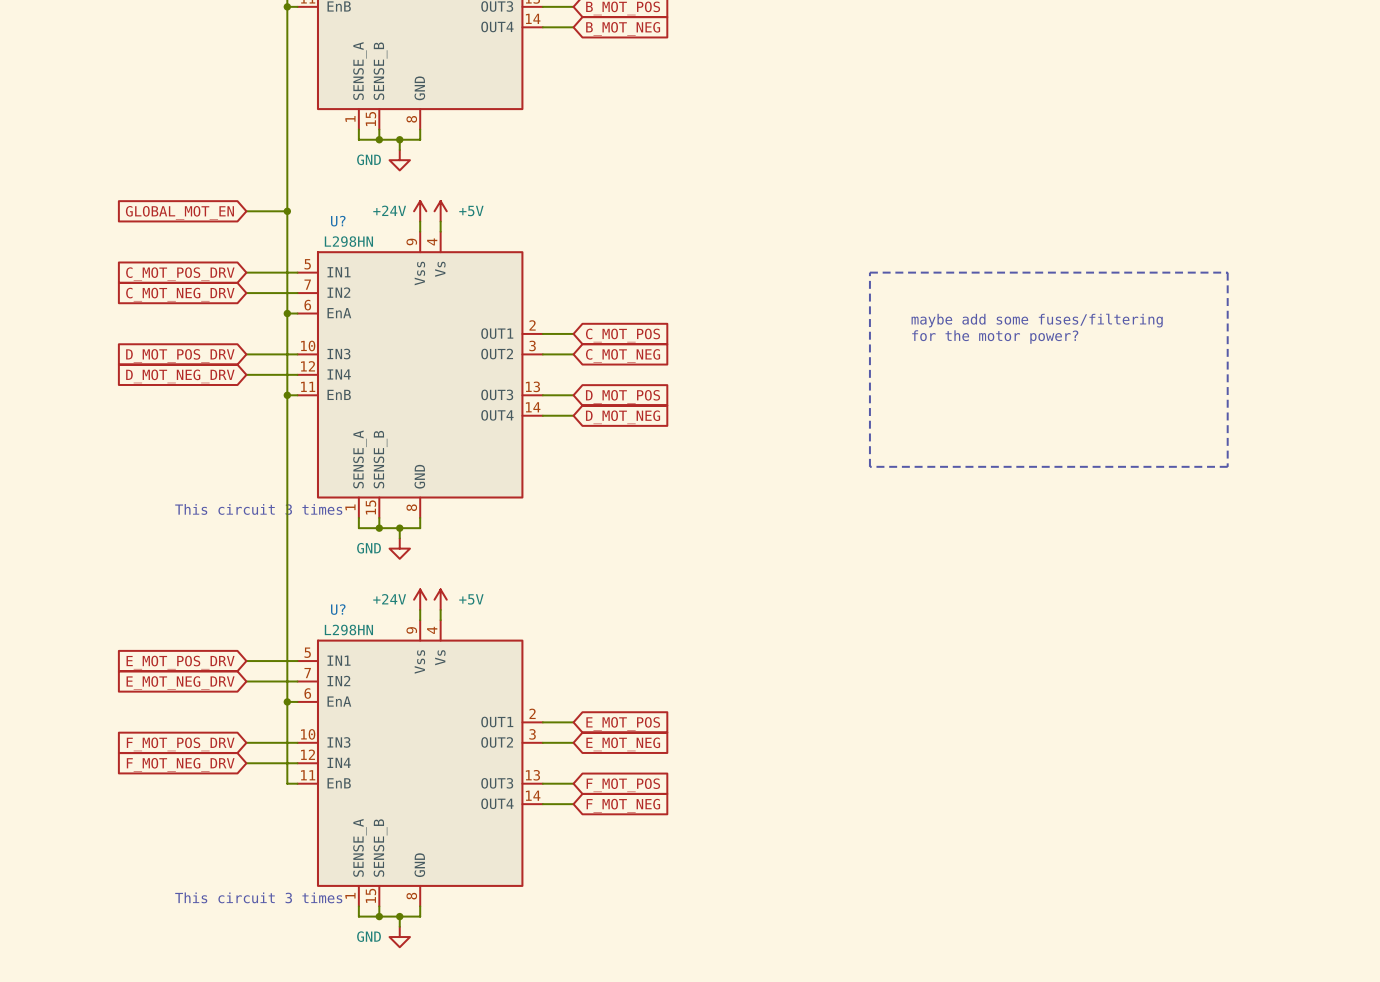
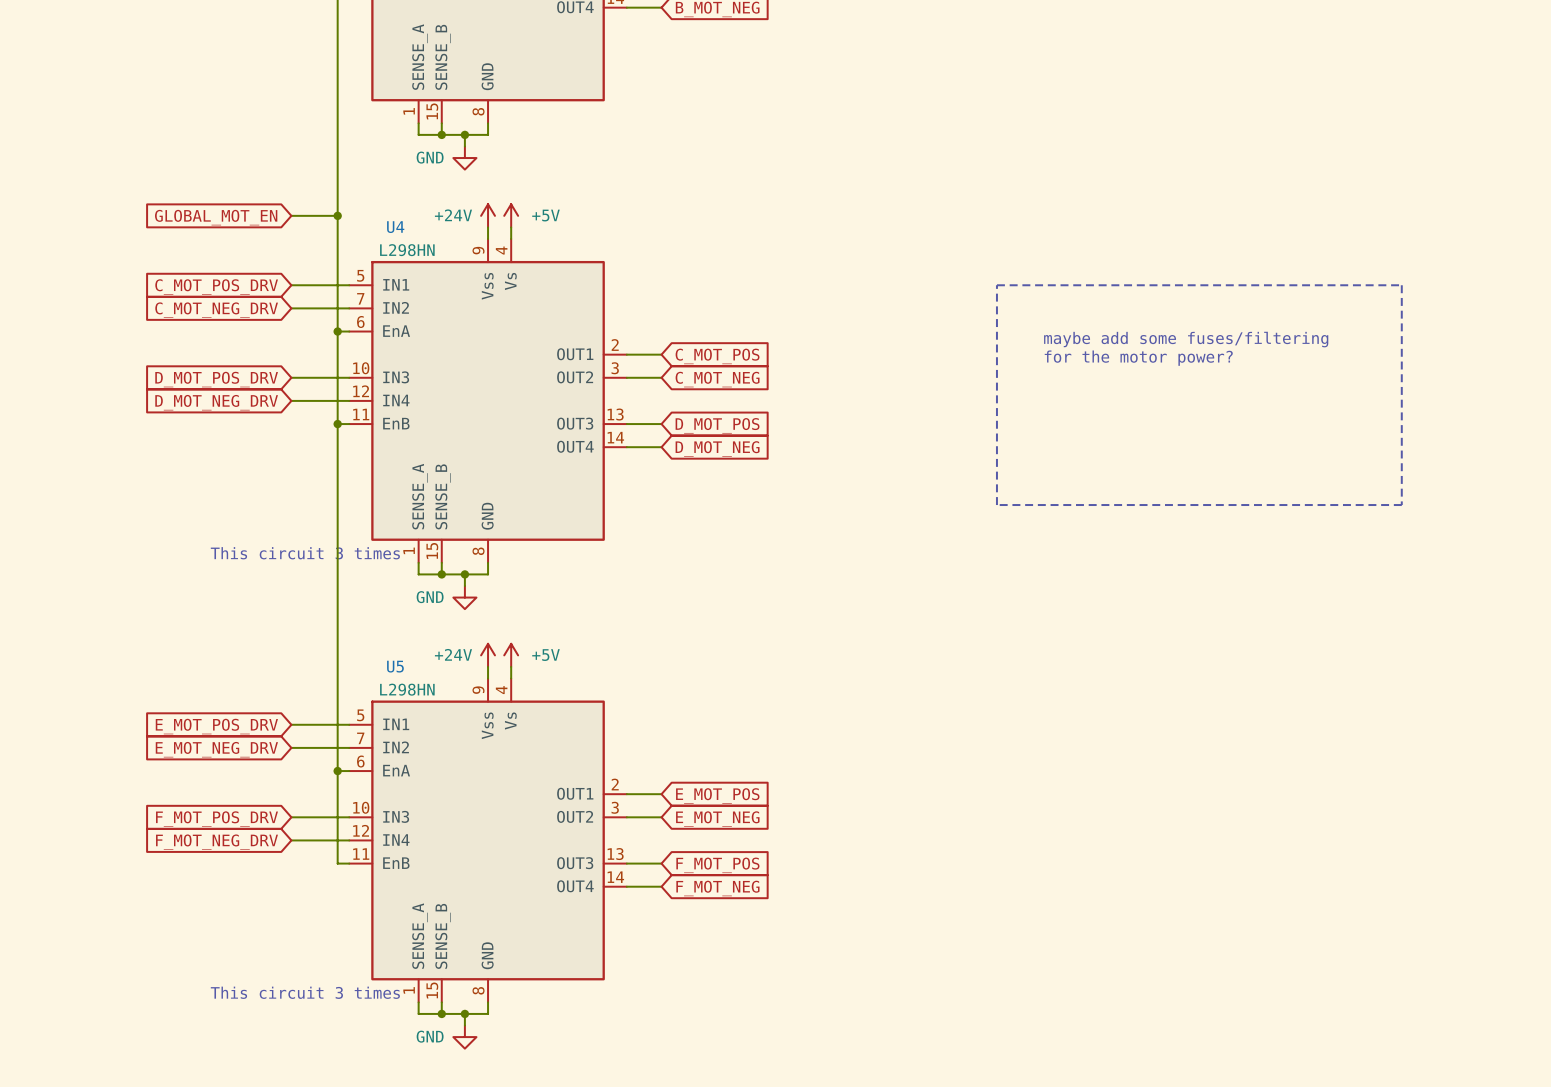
U? name: U? (338, 221) -> U4 (395, 227)
U? name: U? (338, 609) -> U5 (395, 666)

